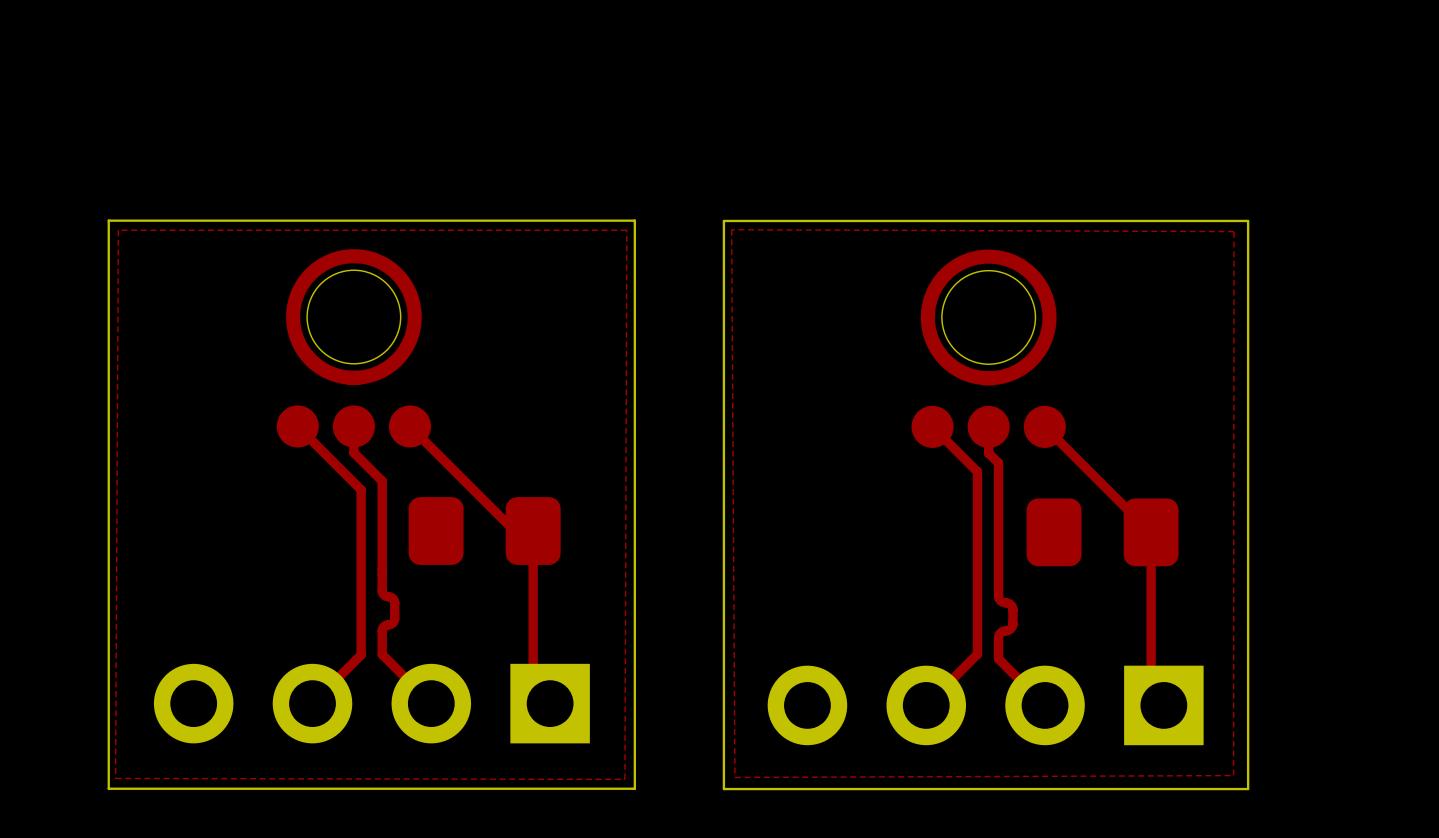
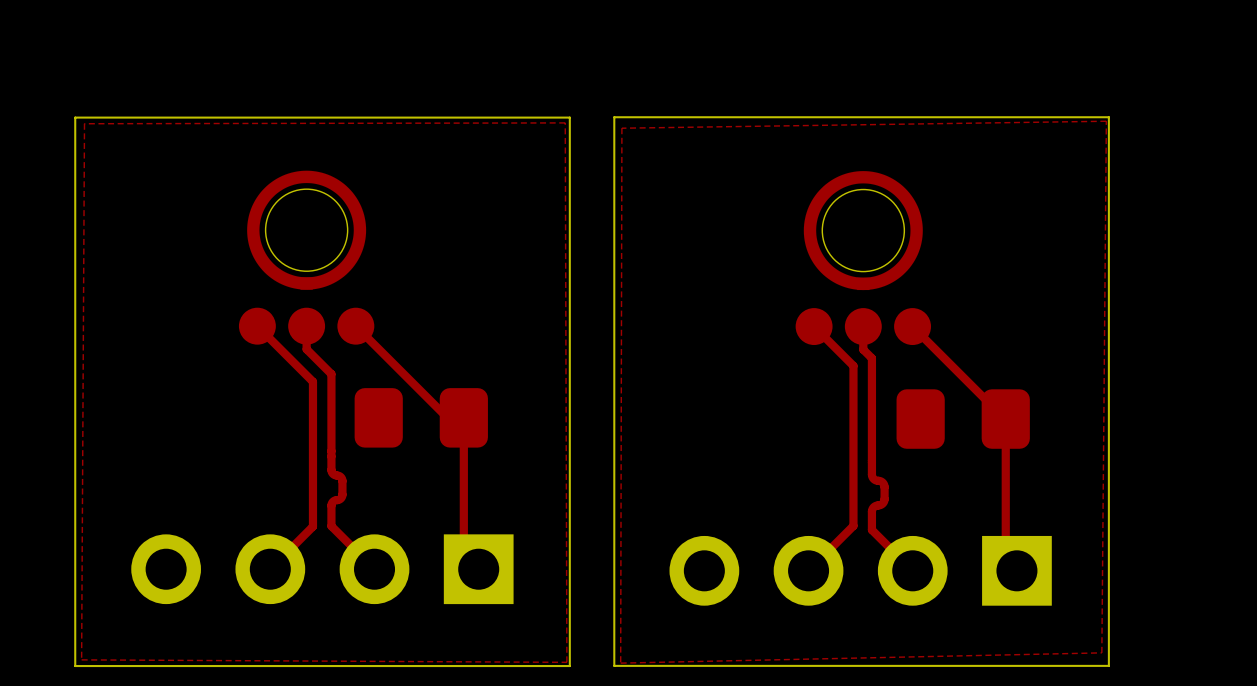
board edge: (634, 220) (108, 220) (108, 788) (634, 788) (634, 220) -> (569, 117) (569, 666) (75, 666) (75, 117) (569, 117)
board edge: (1248, 220) (723, 220) (723, 789) (1248, 789) (1248, 220) -> (1108, 117) (1108, 665) (614, 665) (614, 117) (1108, 117)
top zone outline: (731, 229) (1234, 231) (1233, 775) (734, 777) (731, 229) -> (1106, 121) (1101, 652) (620, 663) (621, 128) (1106, 121)
top zone outline: (626, 230) (118, 230) (115, 778) (624, 779) (626, 230) -> (565, 122) (566, 662) (81, 659) (84, 123) (565, 122)

